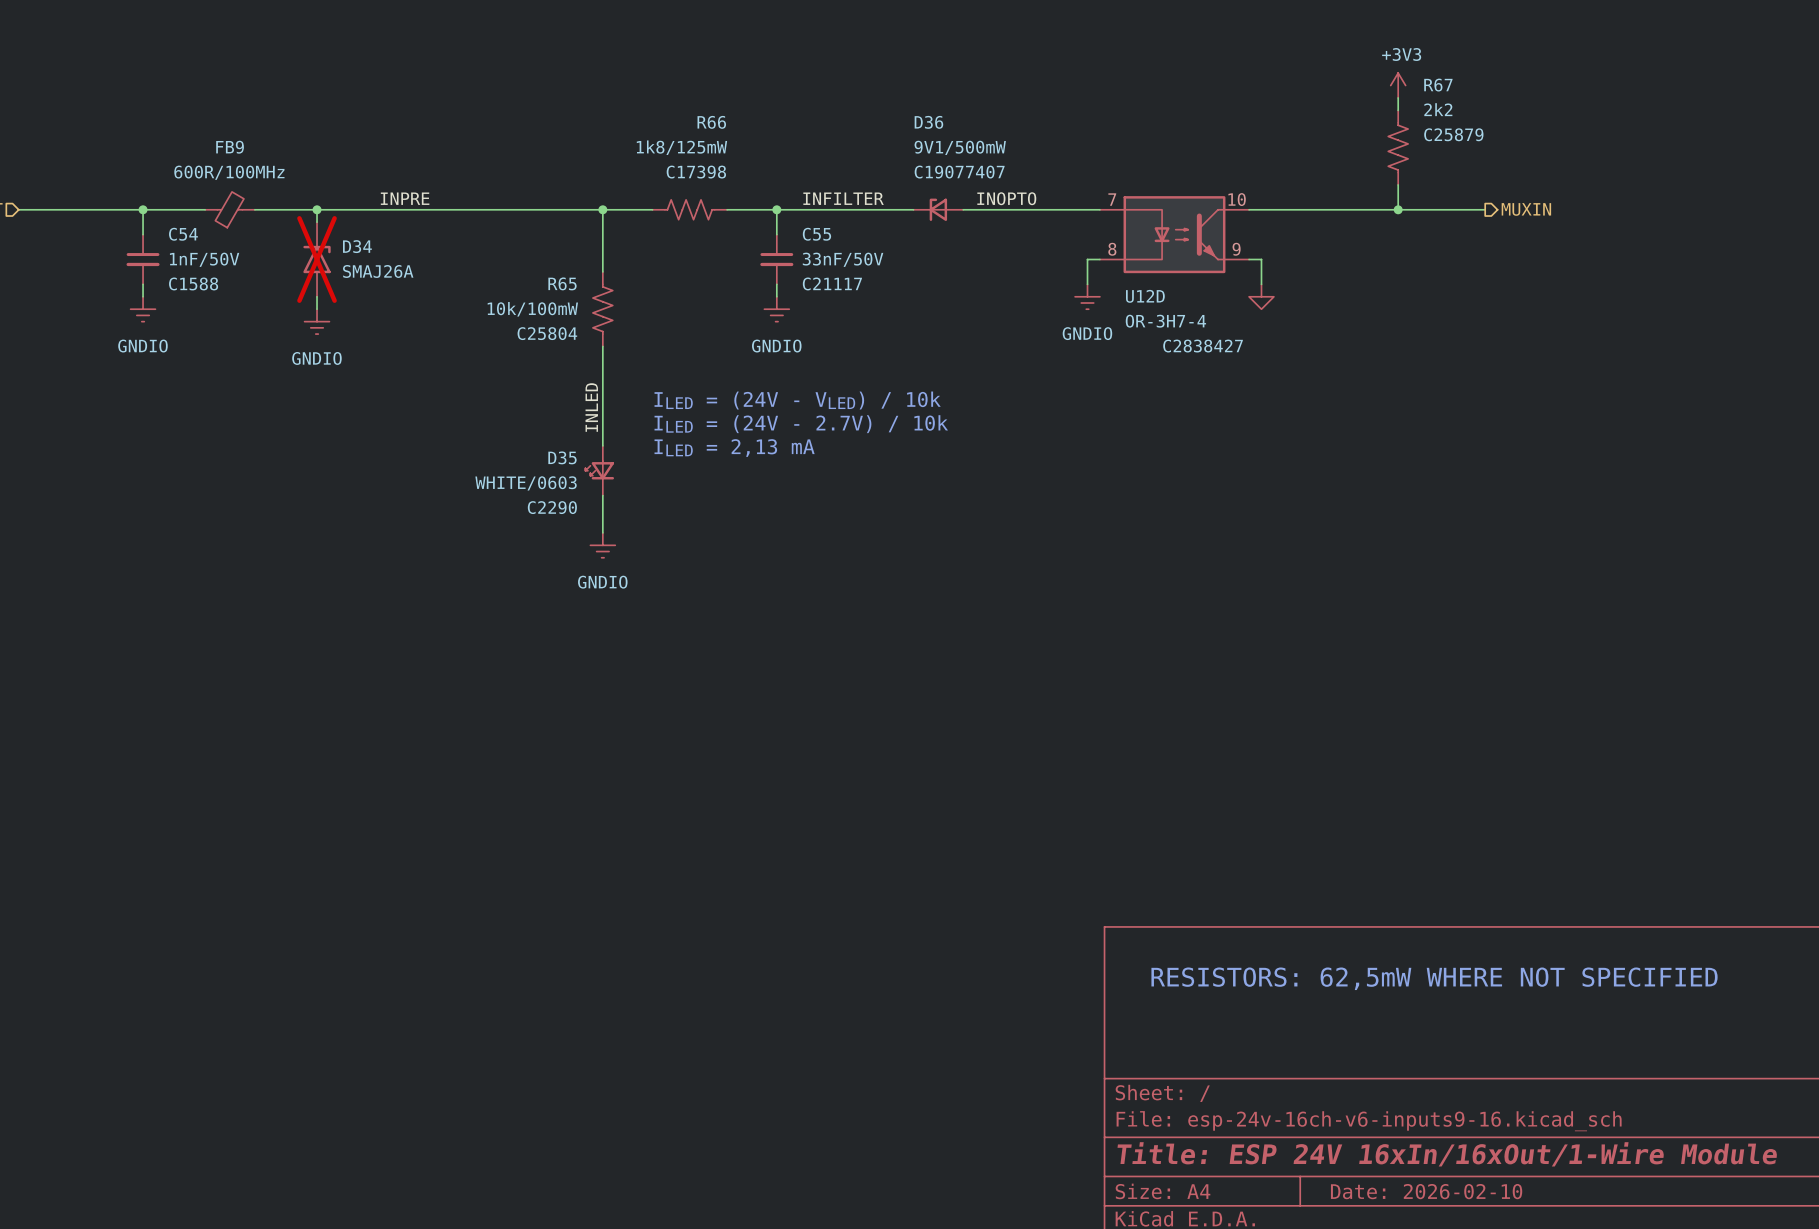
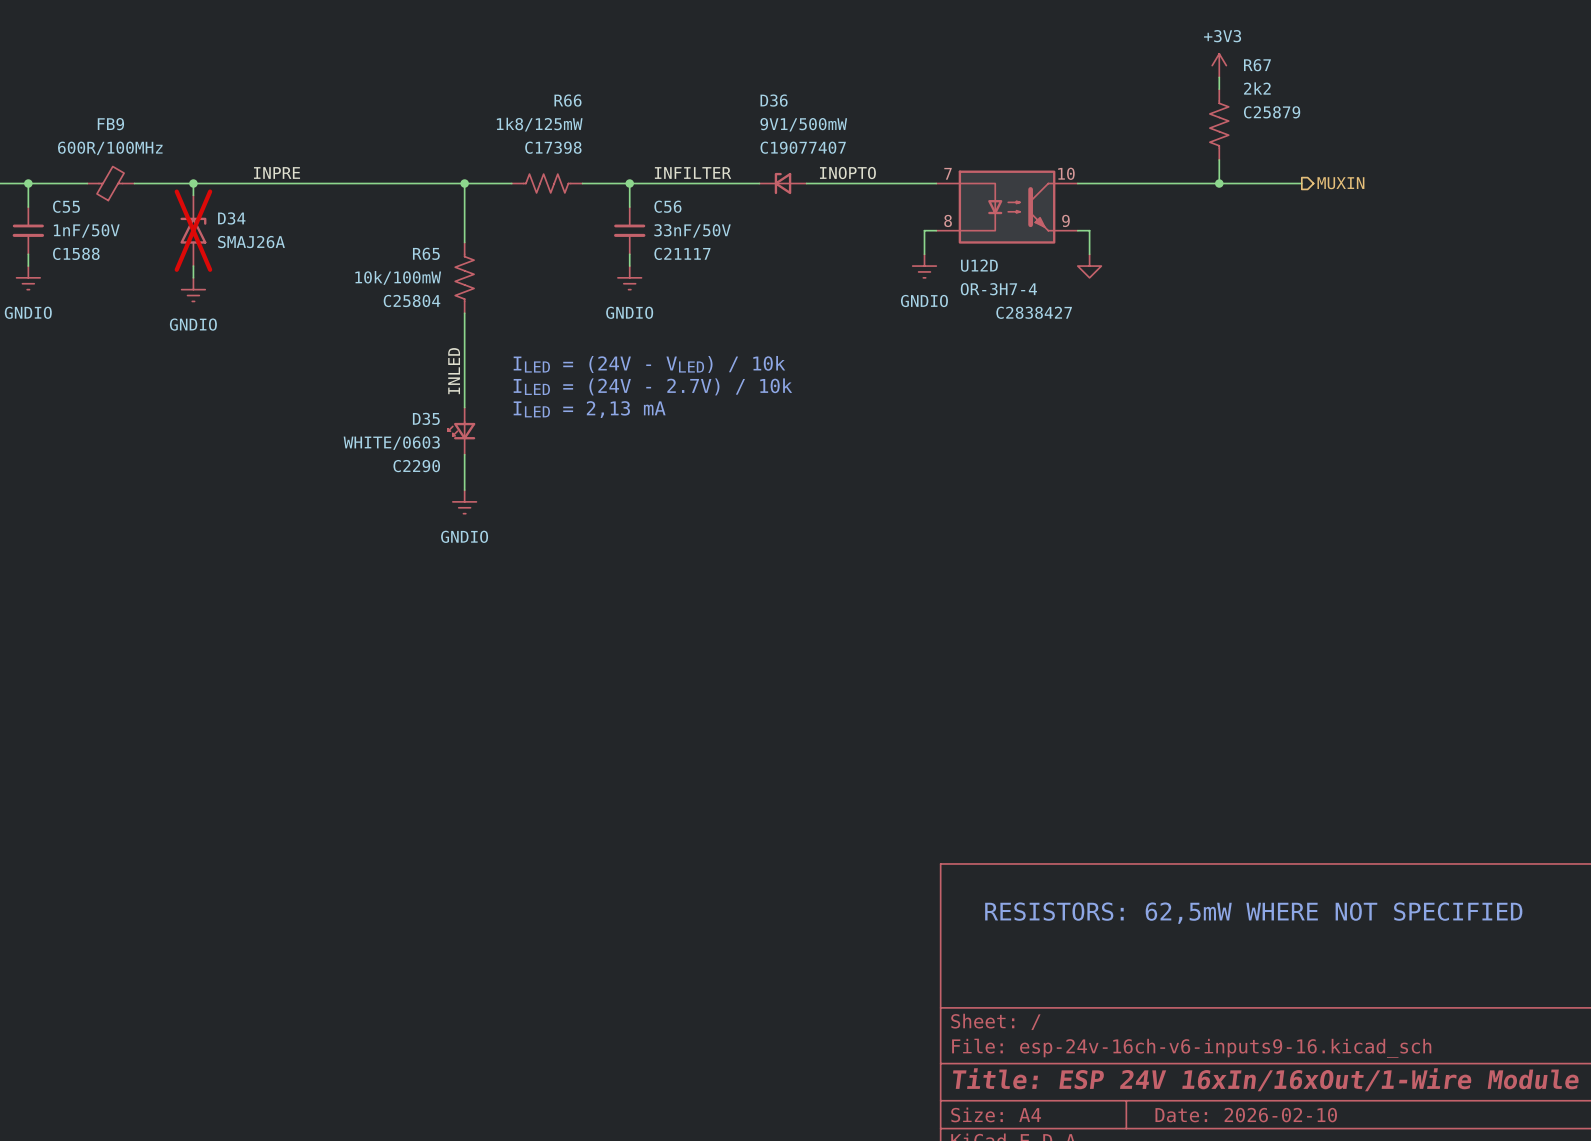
C54 name: C54 (183, 234) -> C55 (66, 206)
C55 name: C55 (816, 234) -> C56 (667, 206)

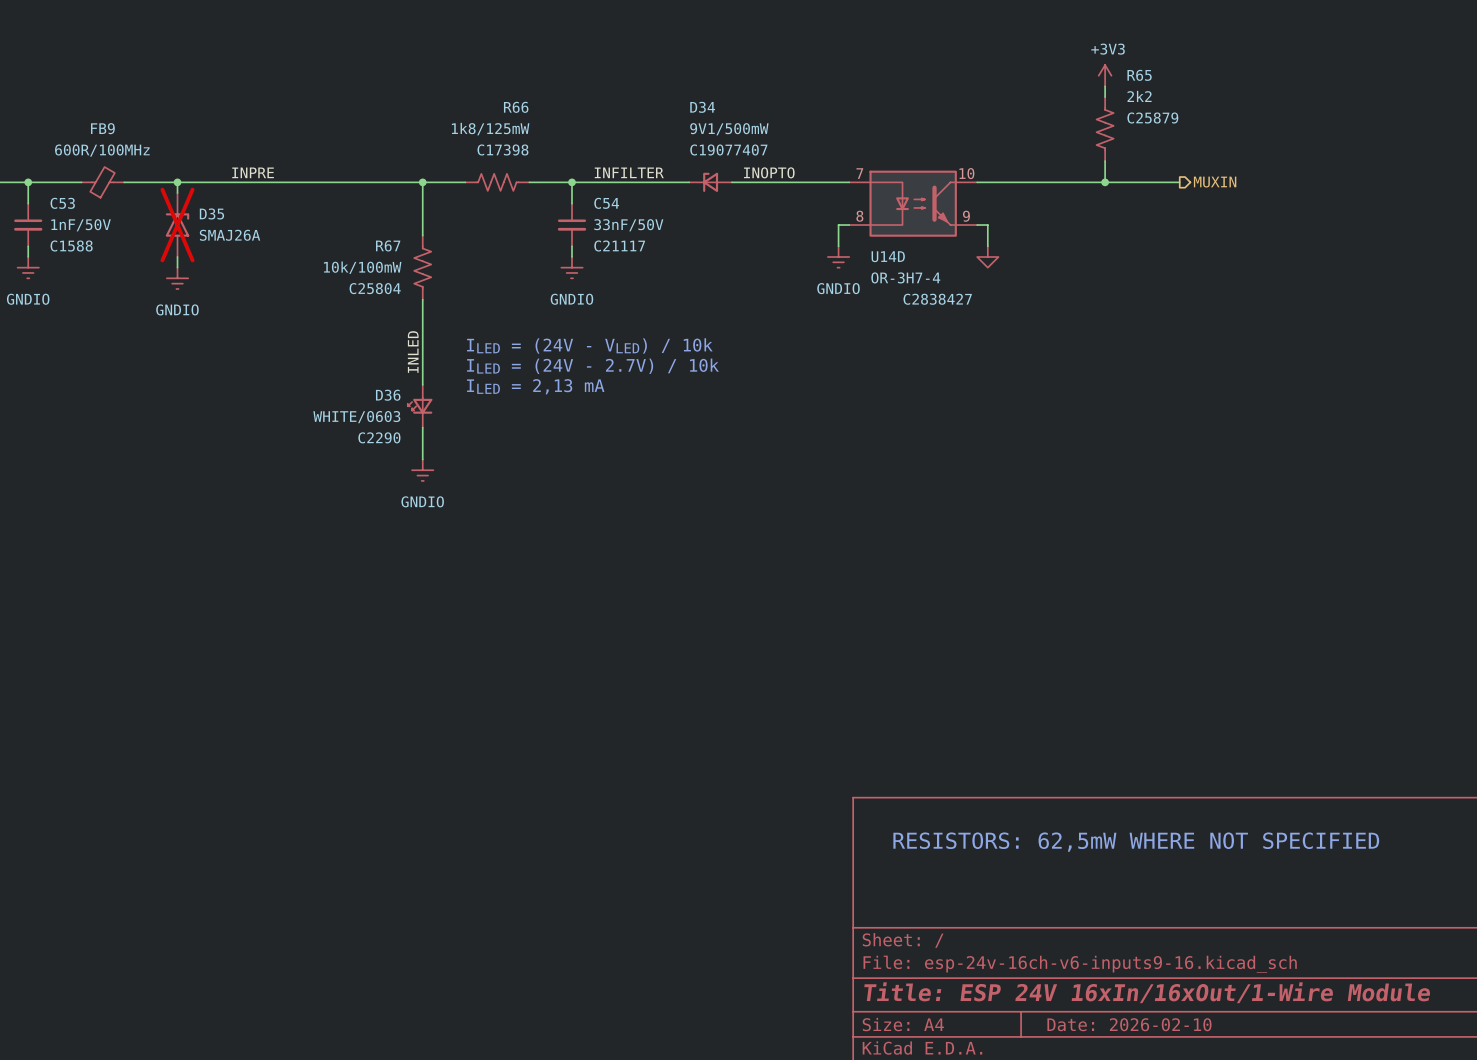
R67 name: R67 (1257, 65) -> R65 (1139, 75)
D36 name: D36 (774, 100) -> D34 (702, 107)
C55 name: C55 (66, 206) -> C53 (62, 203)
C56 name: C56 (667, 206) -> C54 (606, 203)
D34 name: D34 (231, 218) -> D35 (211, 213)
R65 name: R65 (426, 253) -> R67 (388, 245)
U12D name: U12D (979, 265) -> U14D (888, 256)
D35 name: D35 (426, 418) -> D36 (388, 395)

